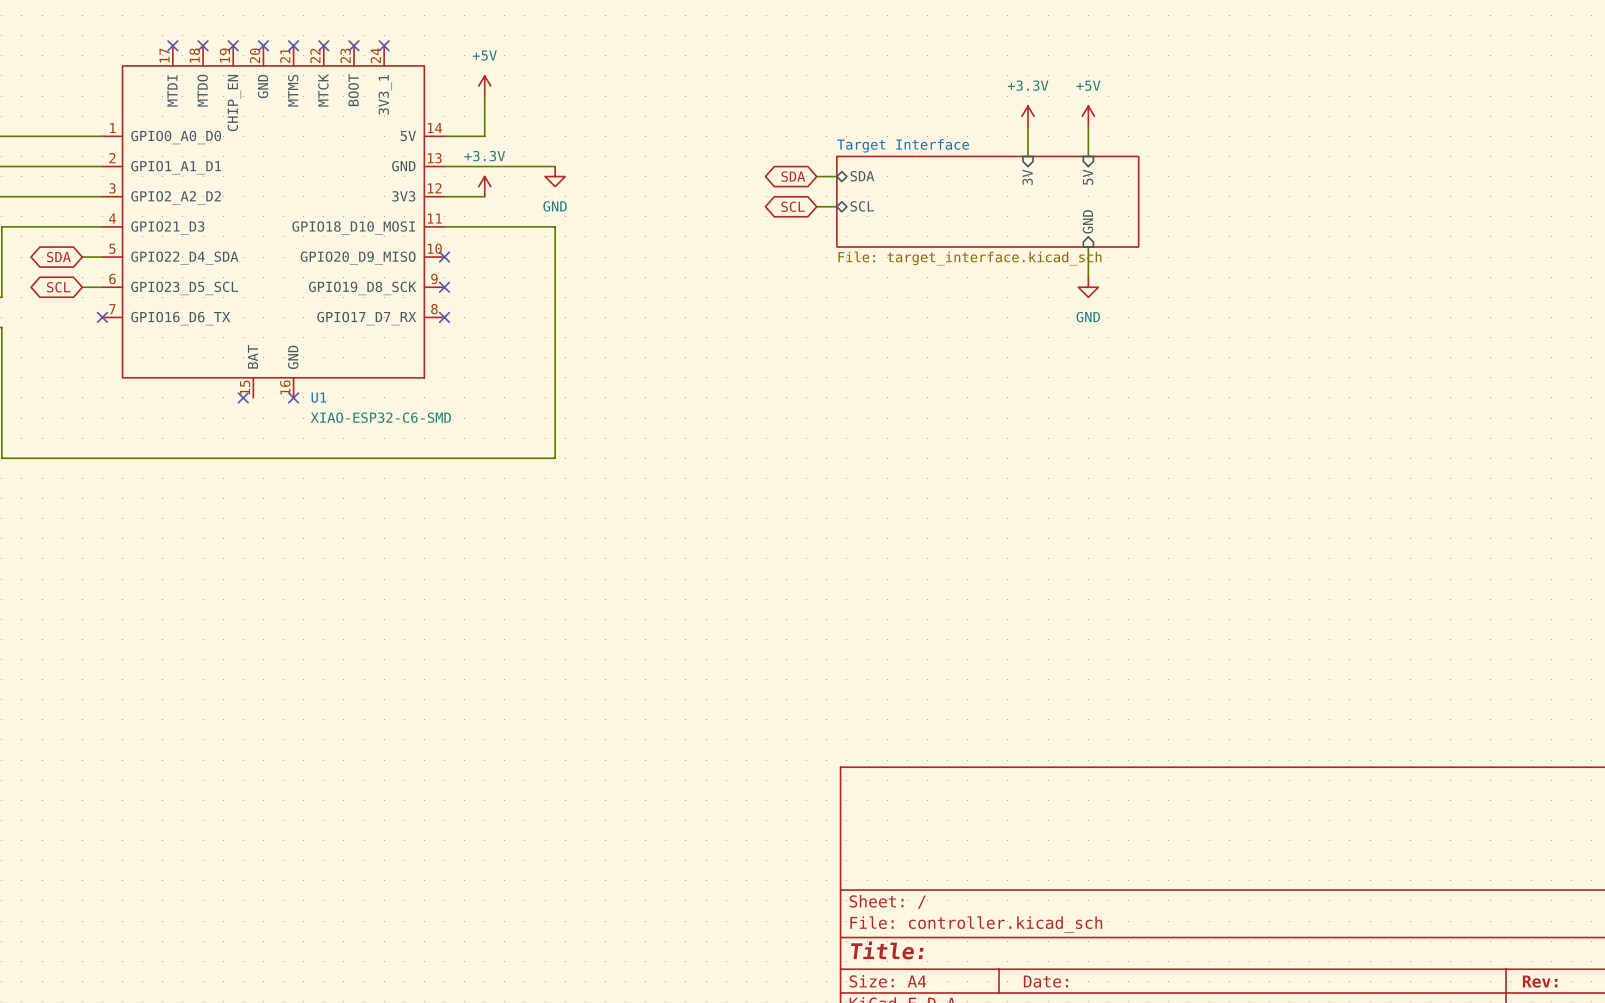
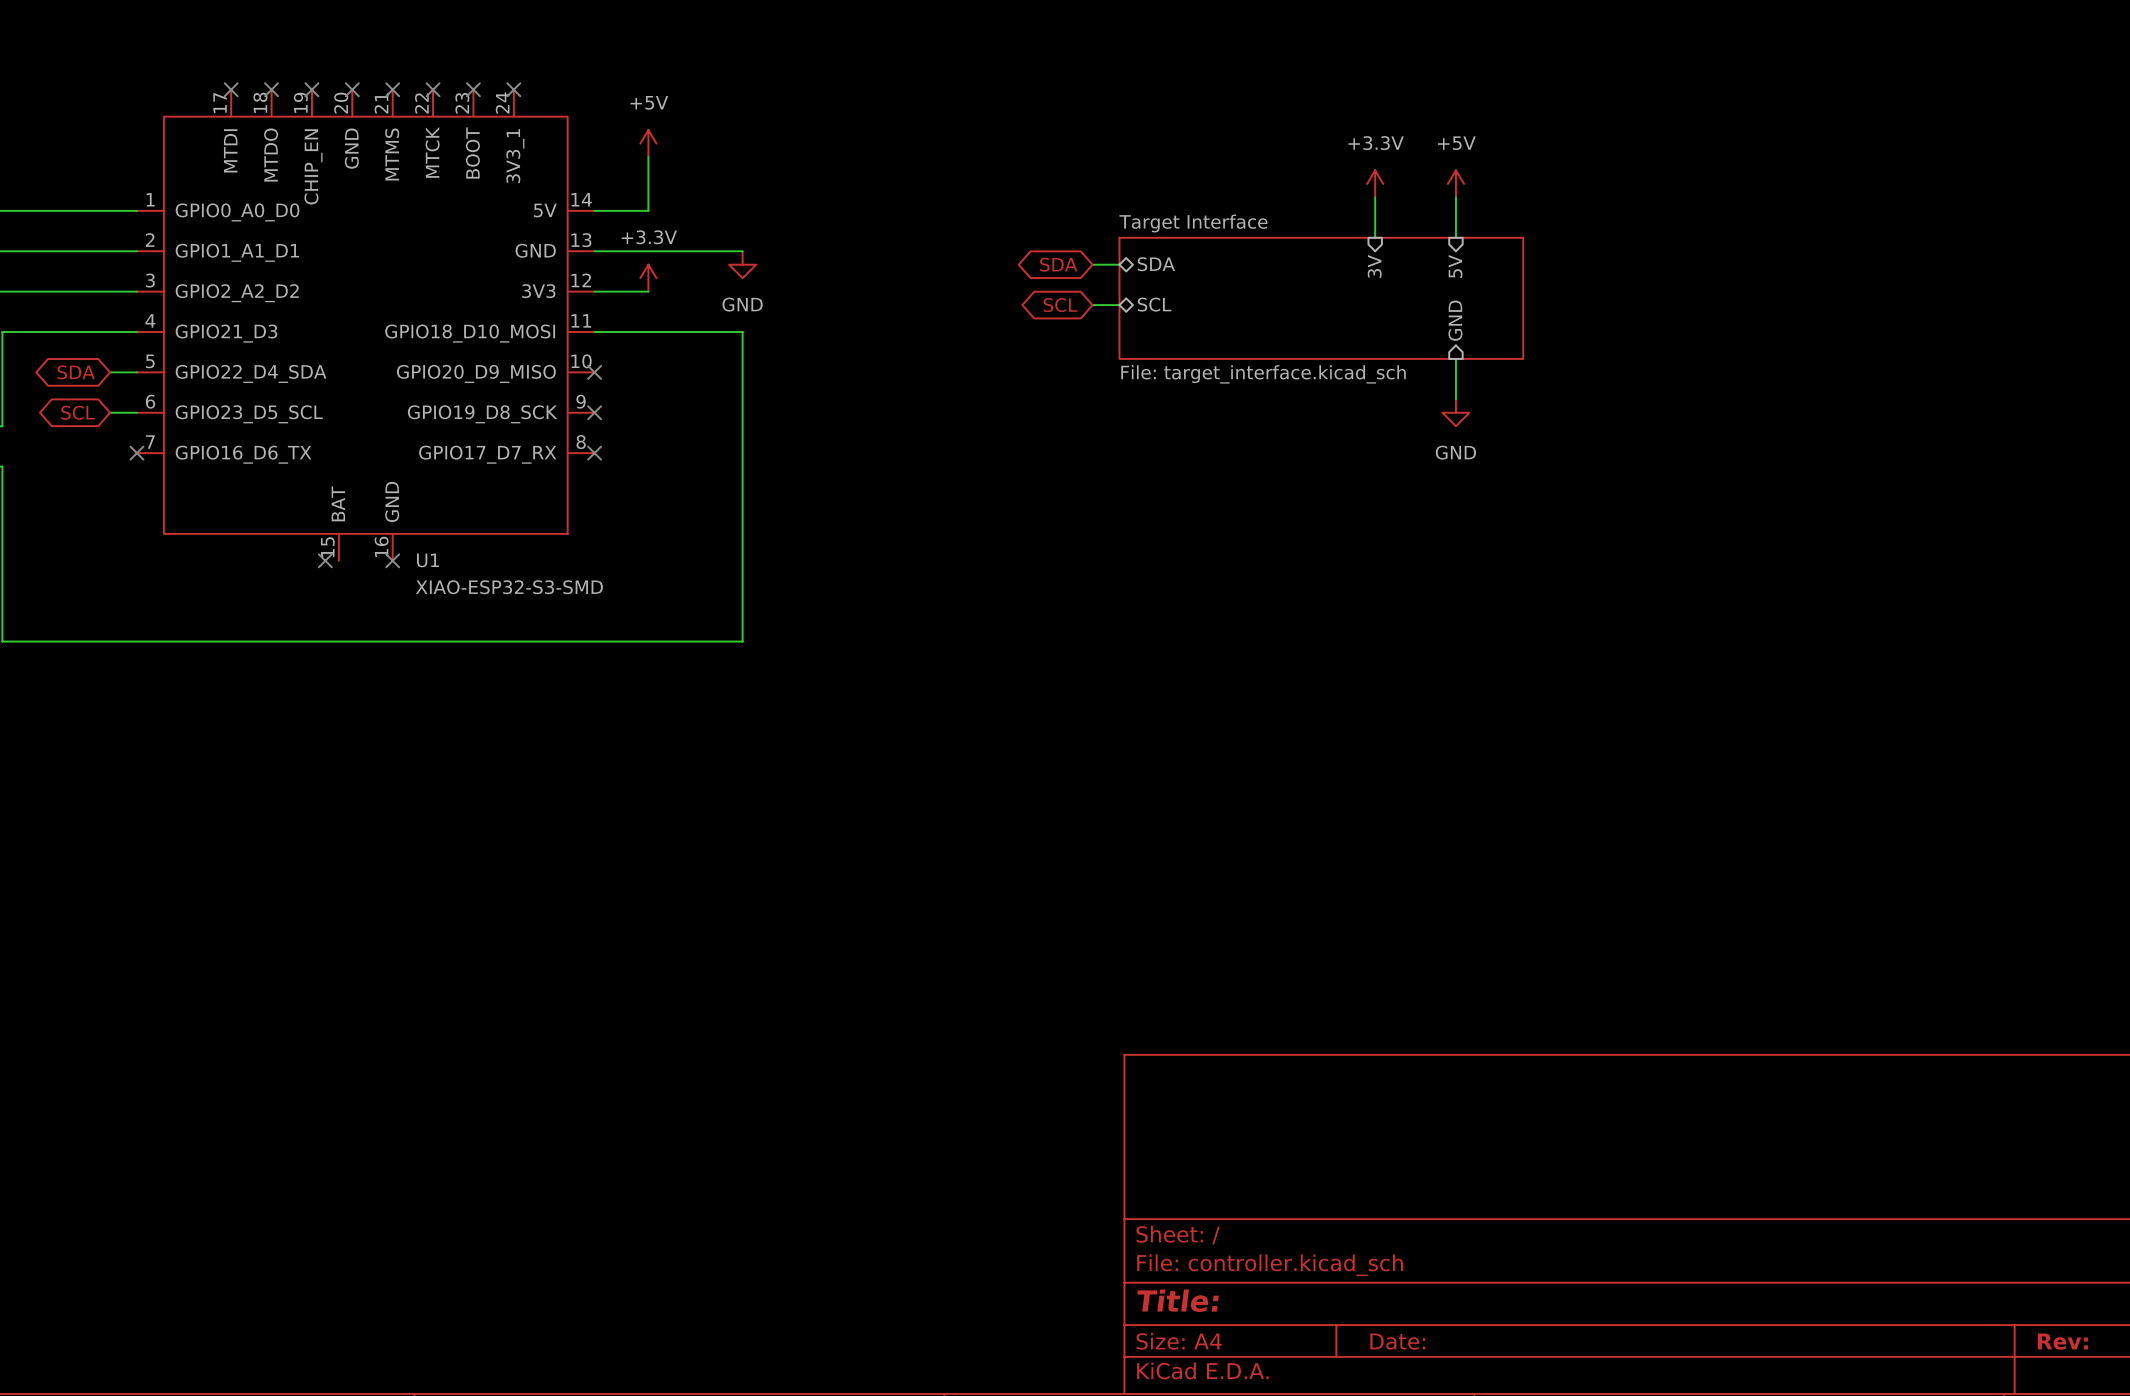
U1 value: XIAO-ESP32-C6-SMD (380, 417) -> XIAO-ESP32-S3-SMD (509, 587)

